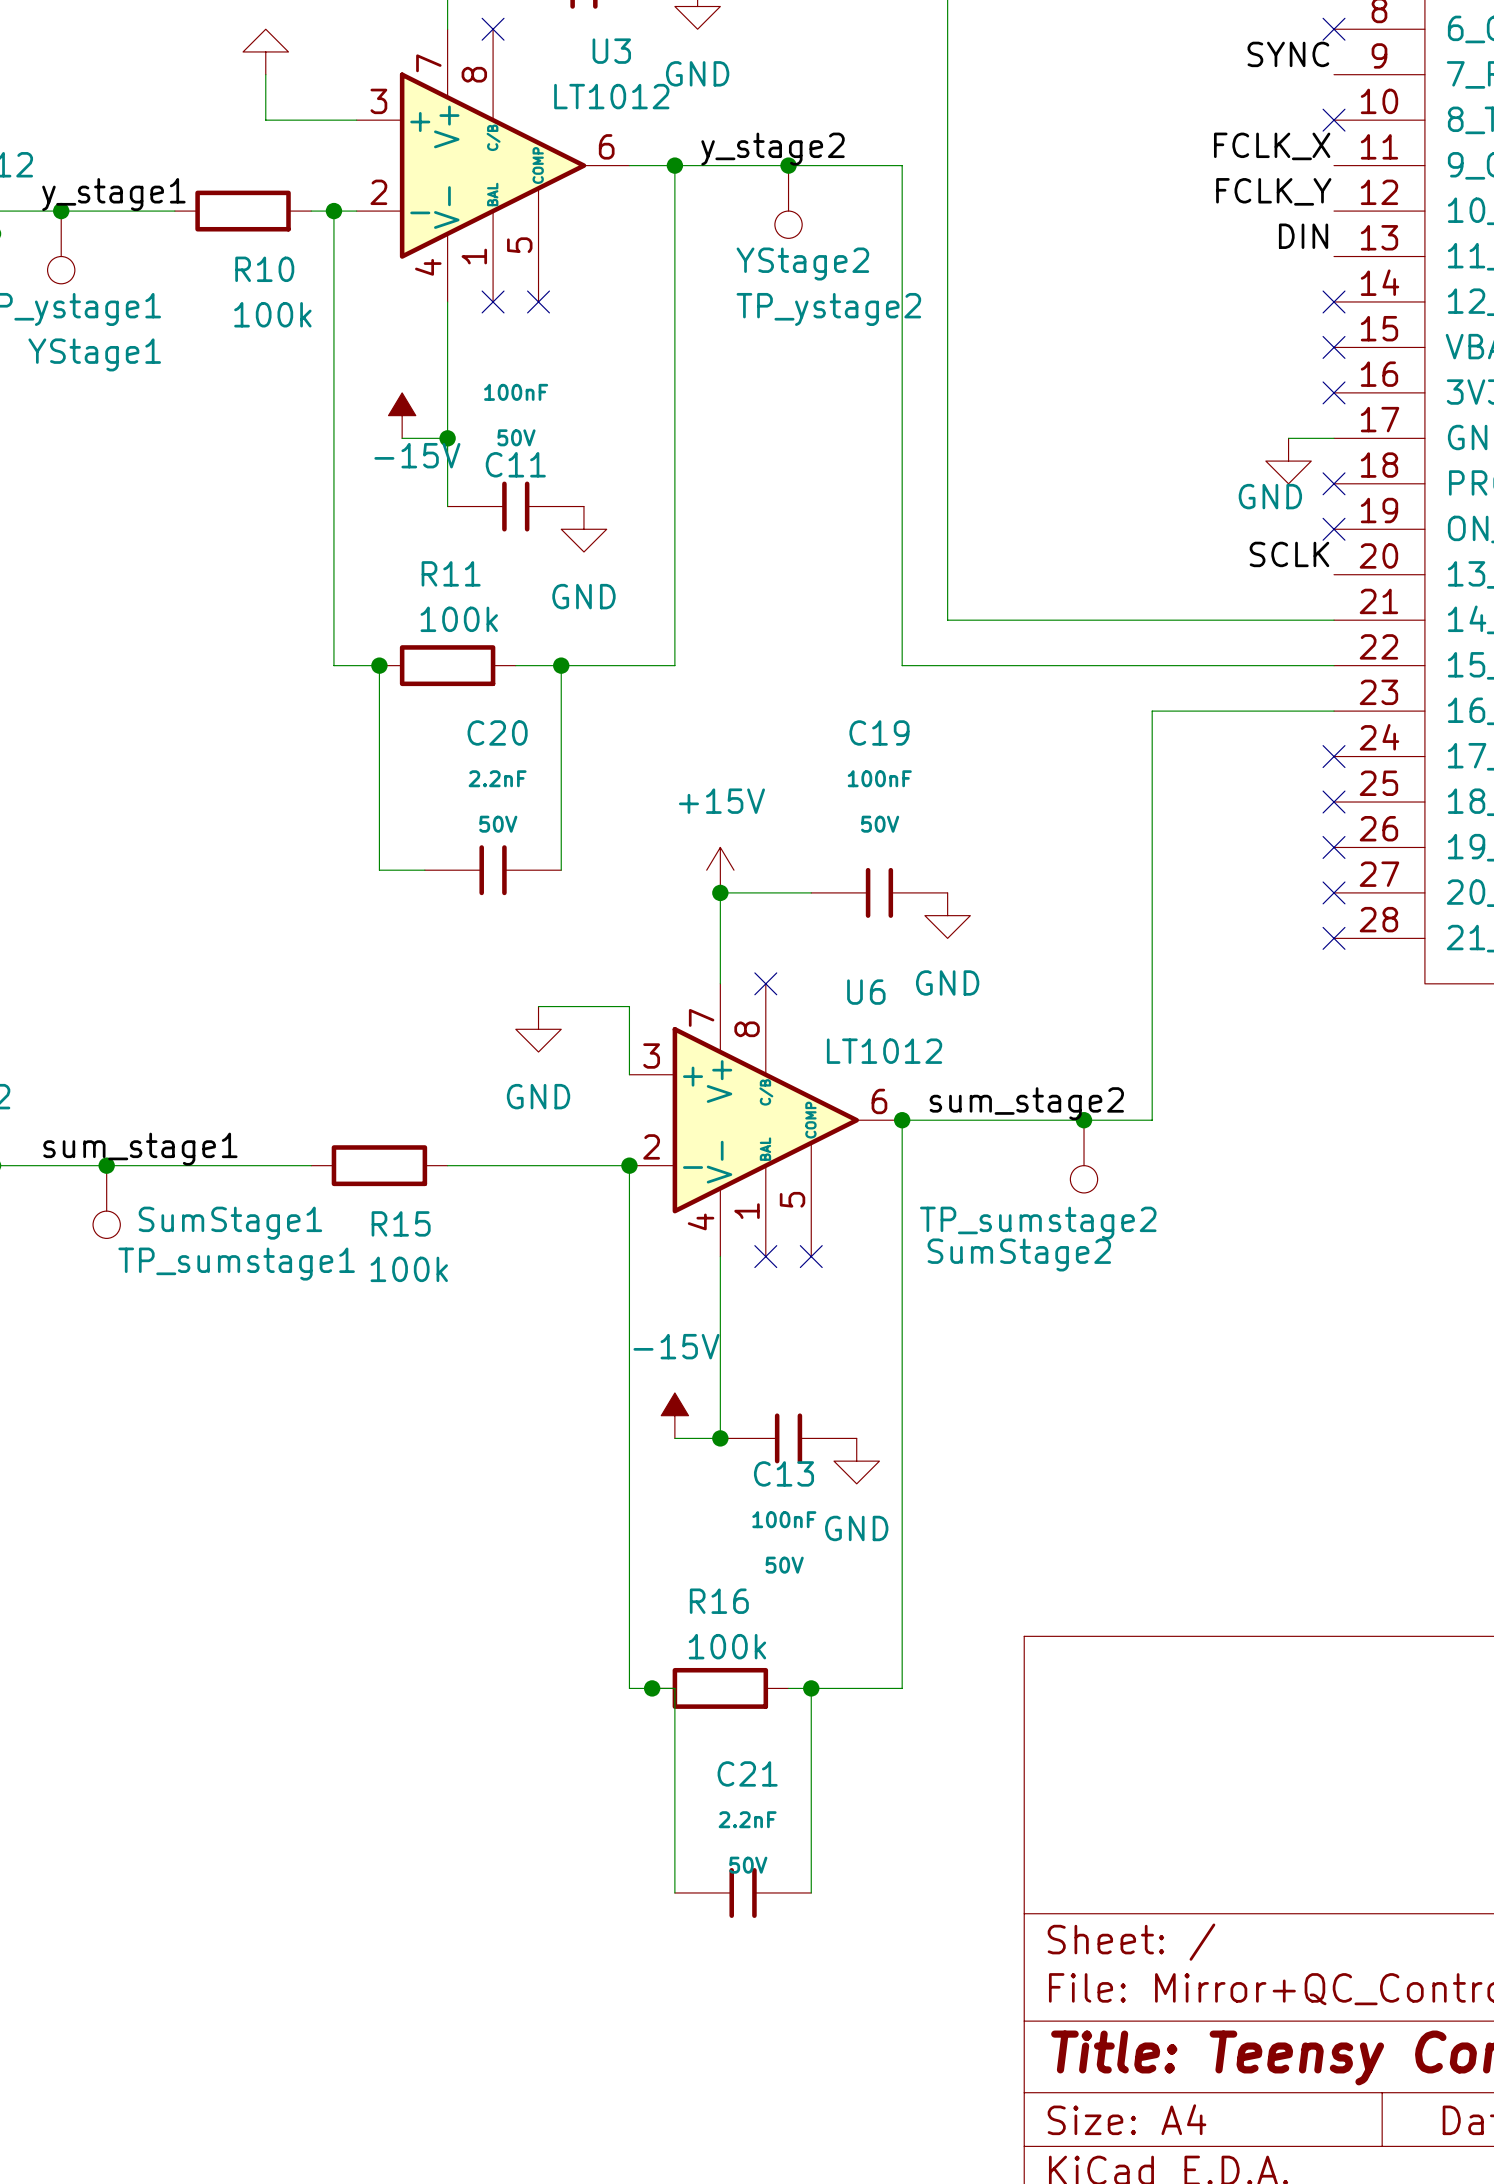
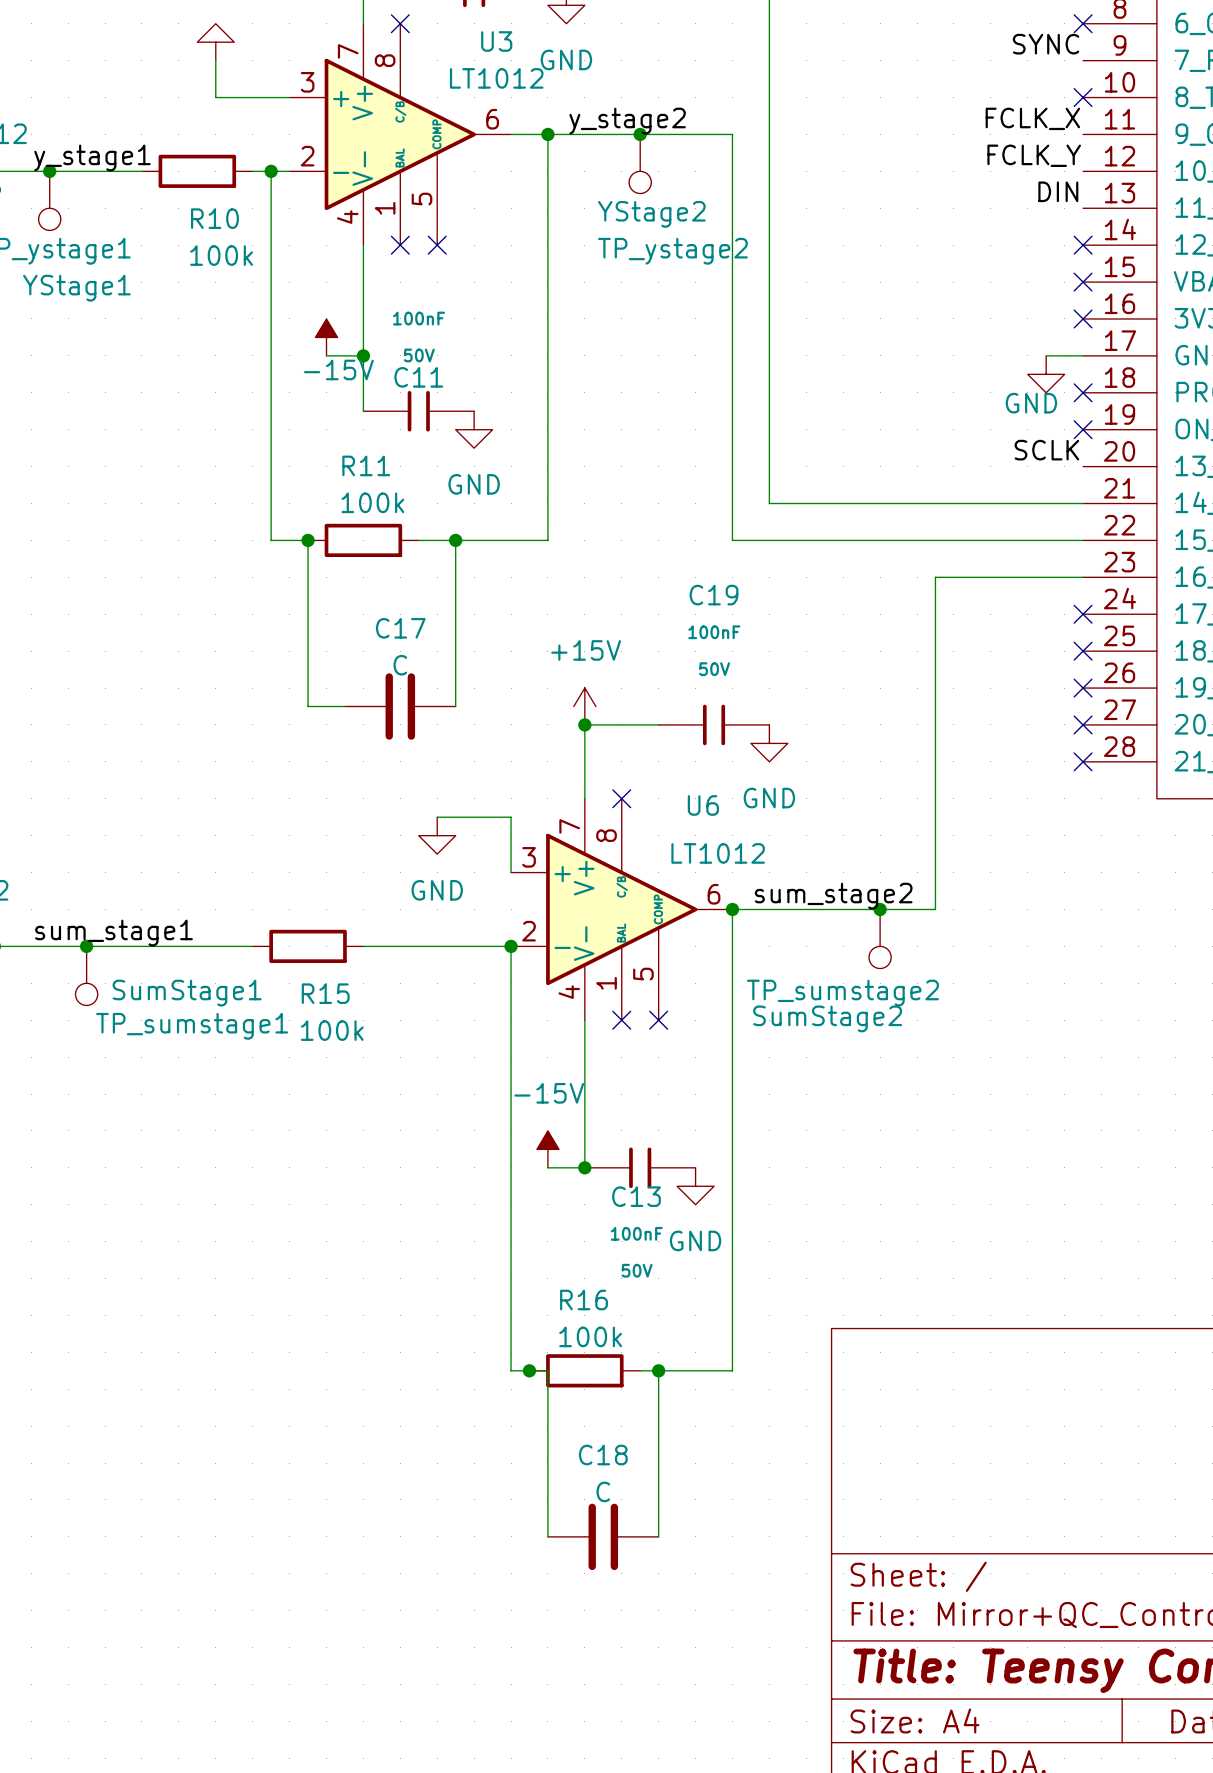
C20: 2.2nF (493, 870) -> none
C17: none -> C (400, 706)
C21: 2.2nF (743, 1892) -> none
C18: none -> C (603, 1536)

